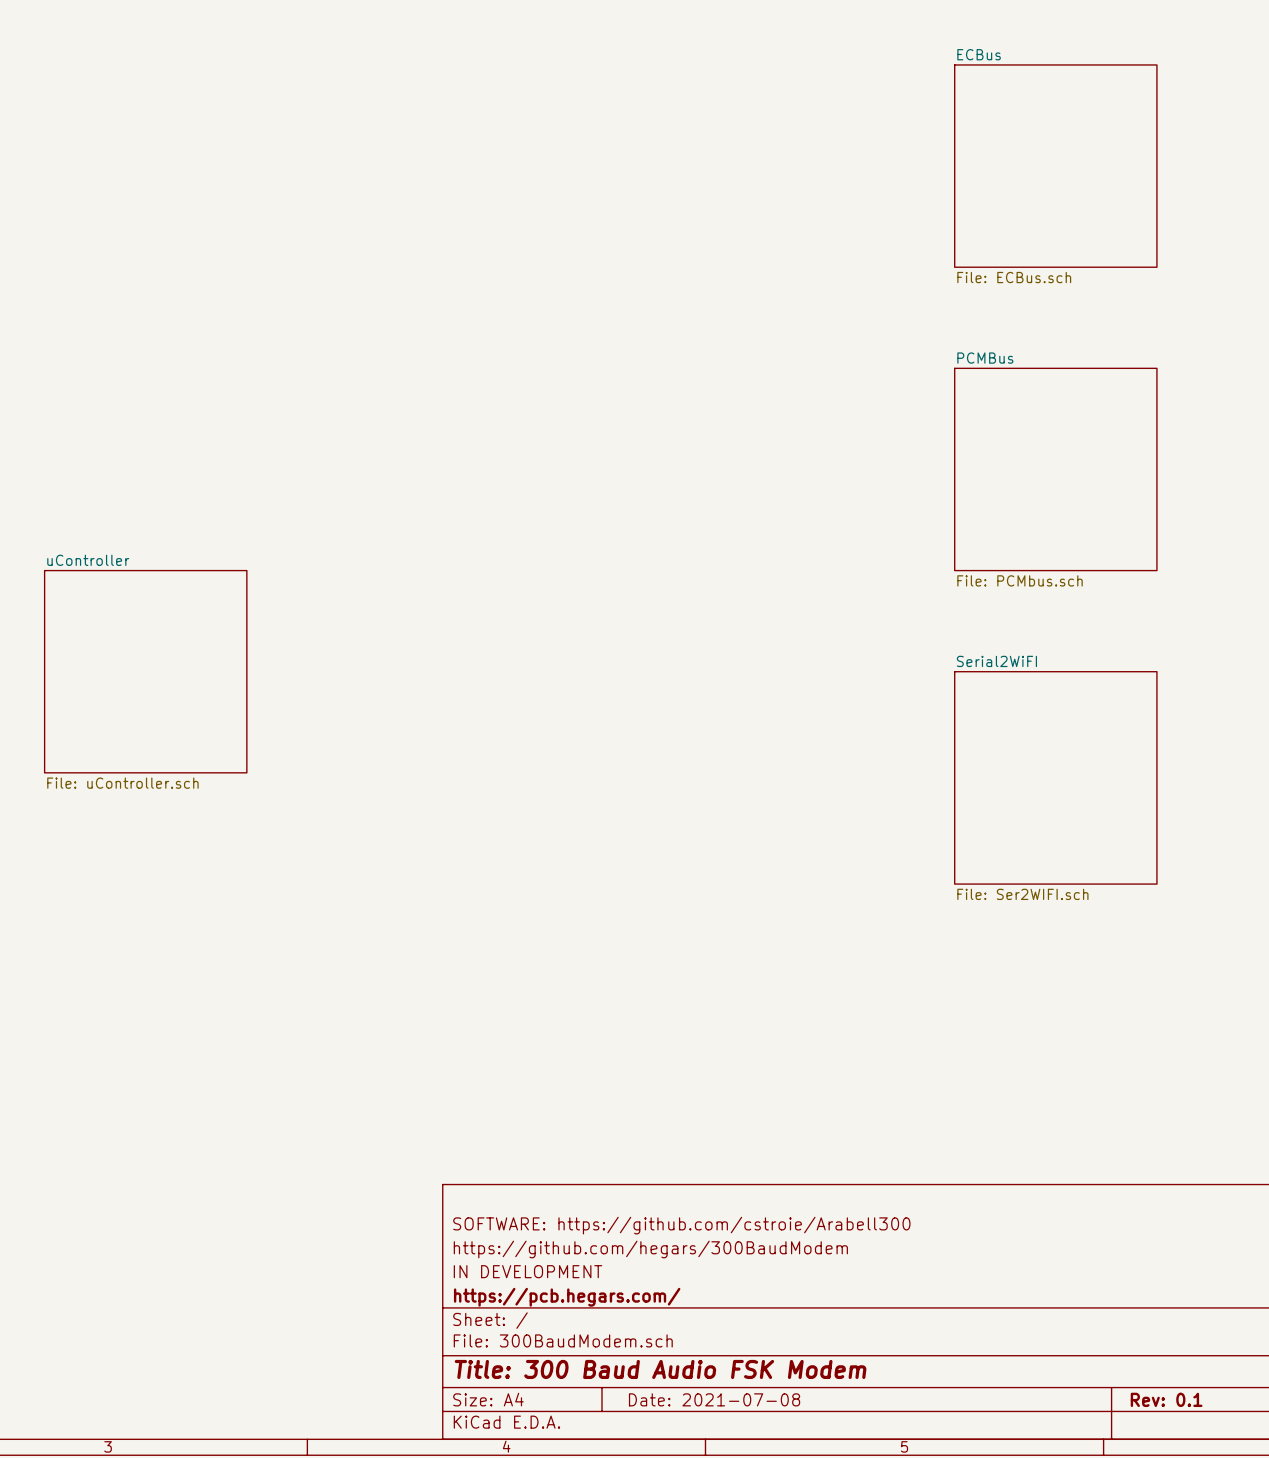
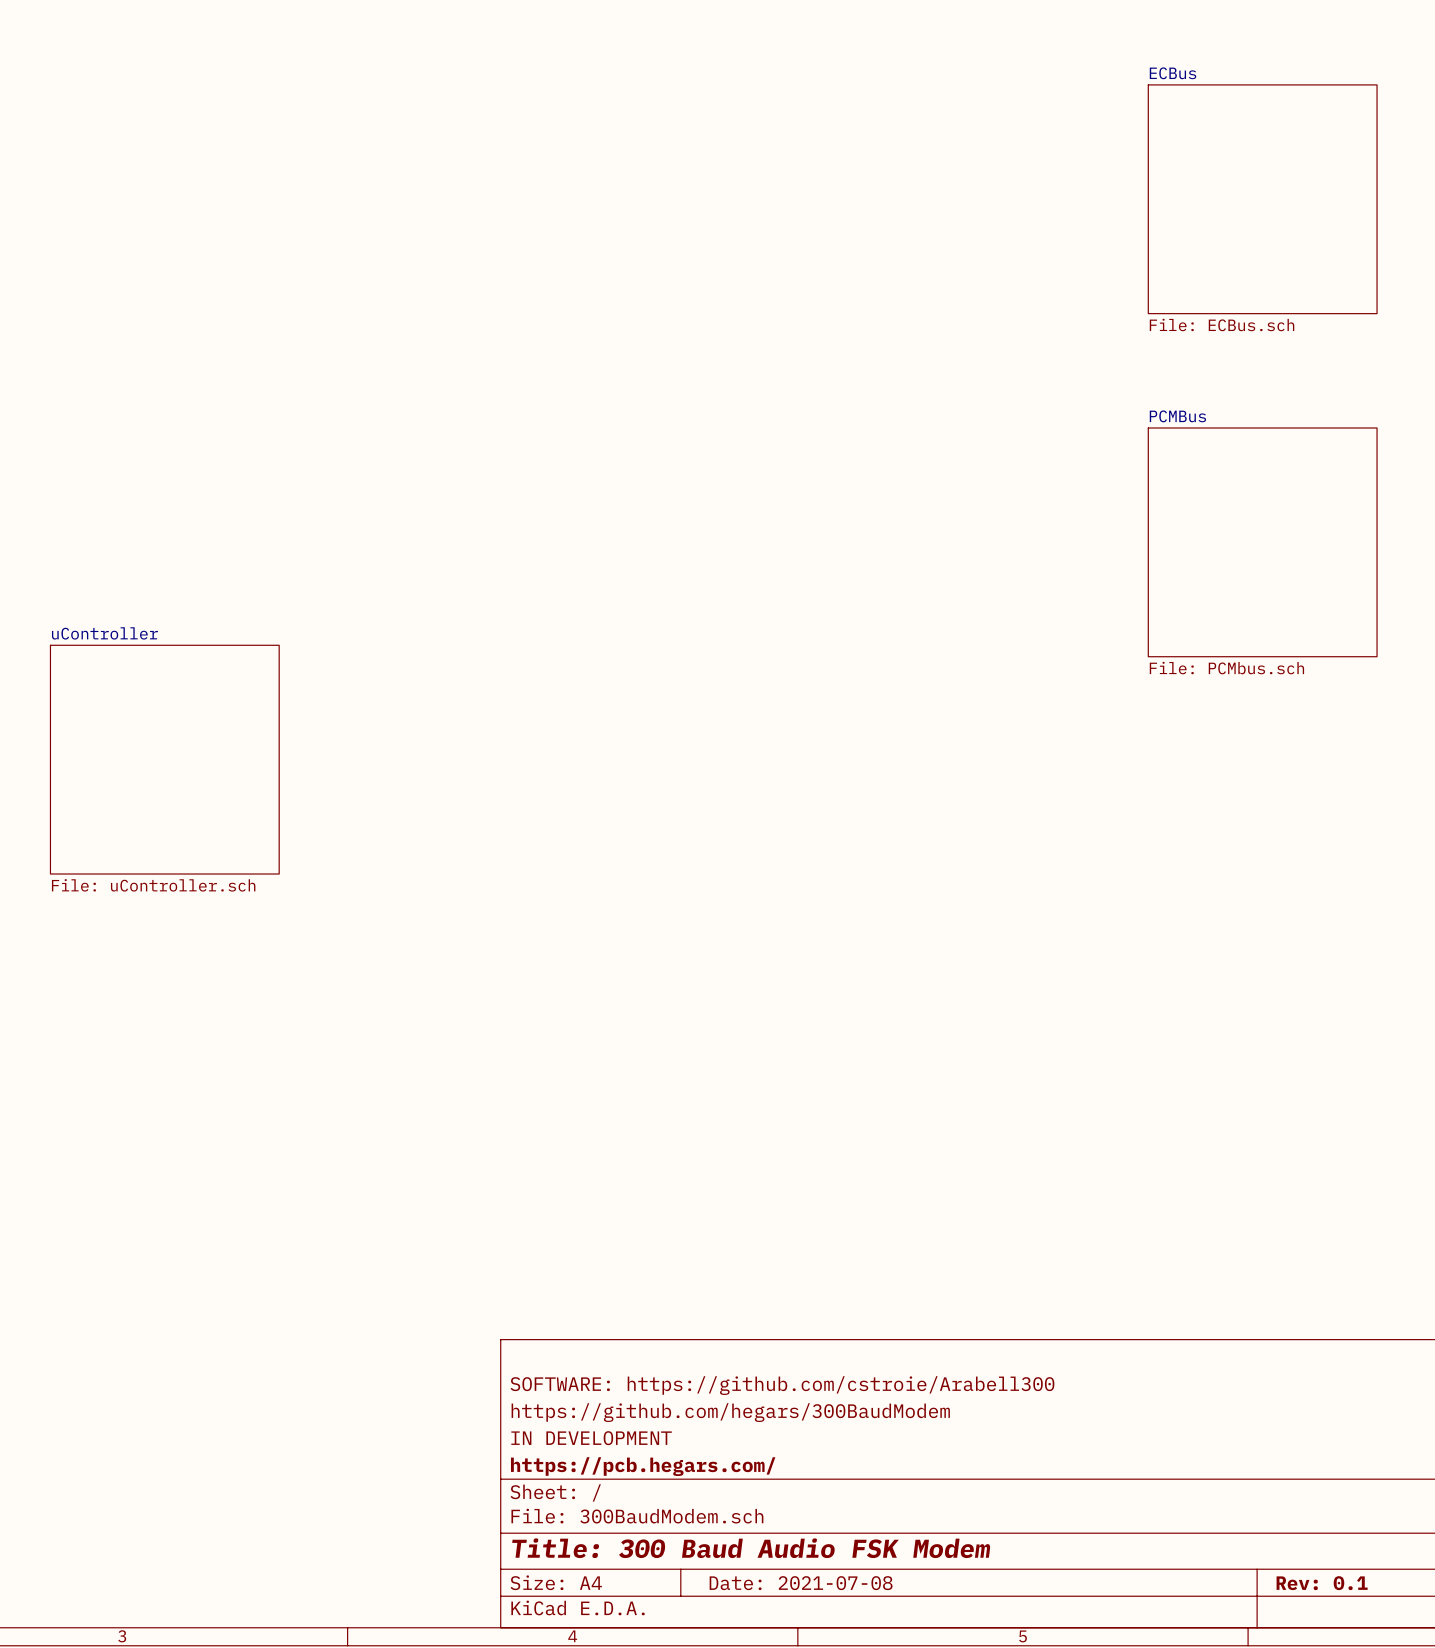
sheet ECBus position: (1055, 166) -> (1262, 199)
sheet PCMBus position: (1055, 469) -> (1262, 542)
sheet Serial2WiFI: File: Ser2WIFI.sch (1055, 777) -> none

